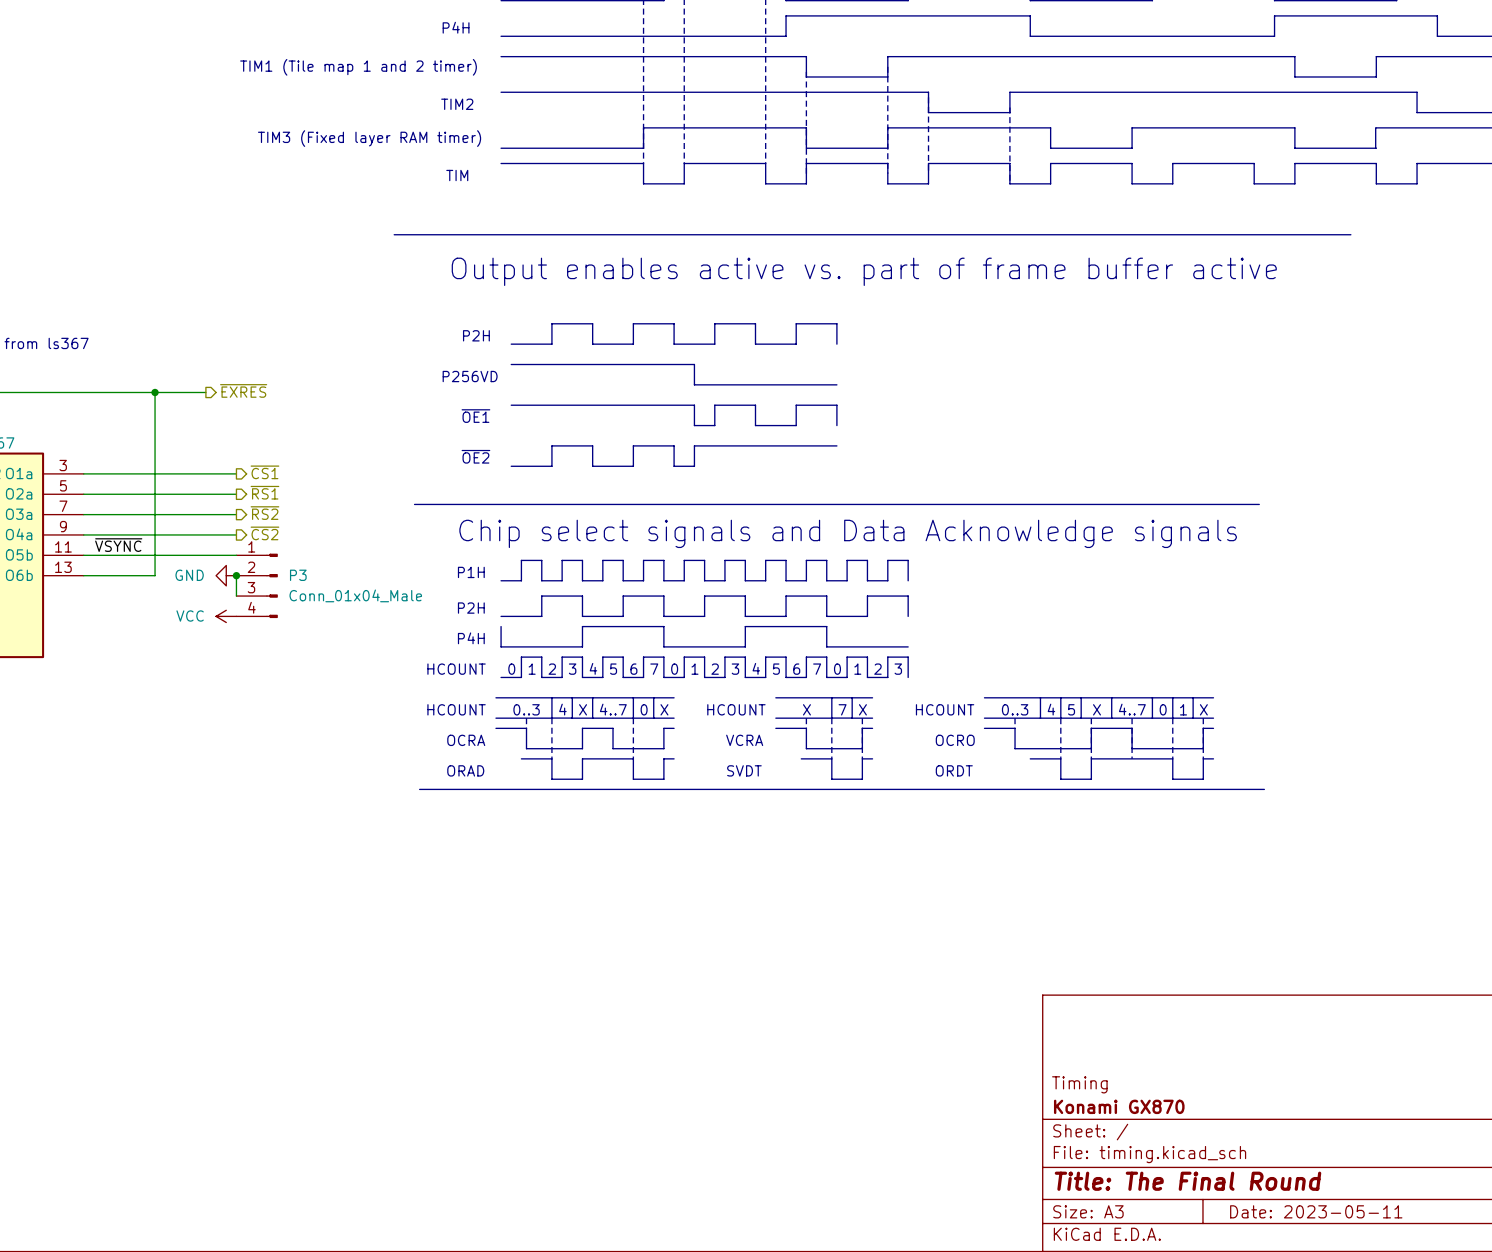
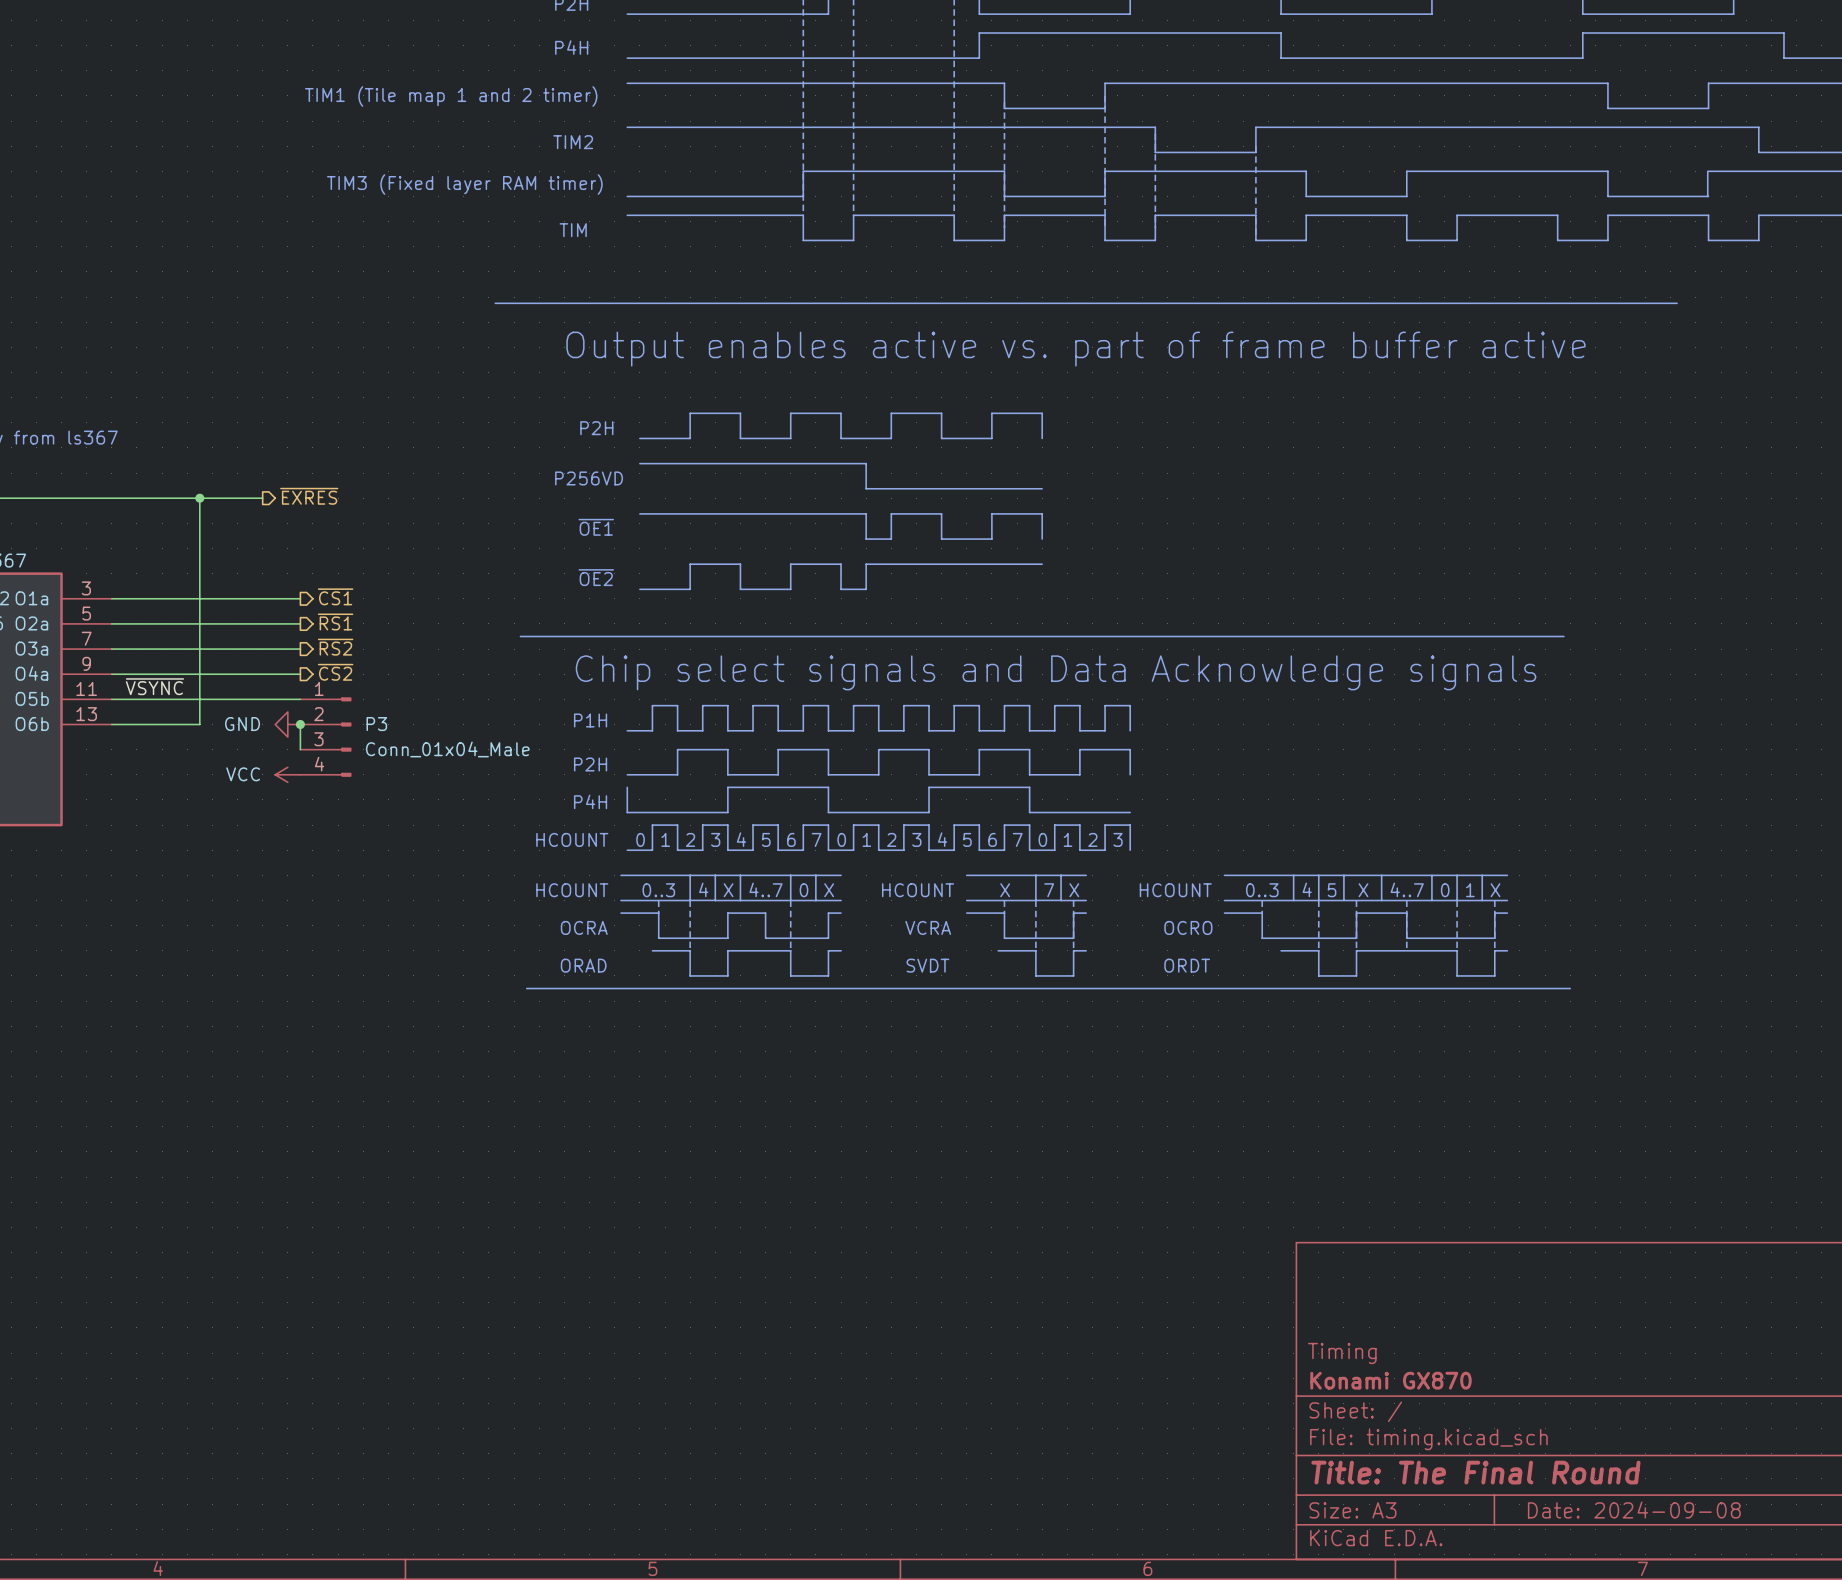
title block: Date: 2023-05-11 (1316, 1211) -> Date: 2024-09-08 (1634, 1510)

